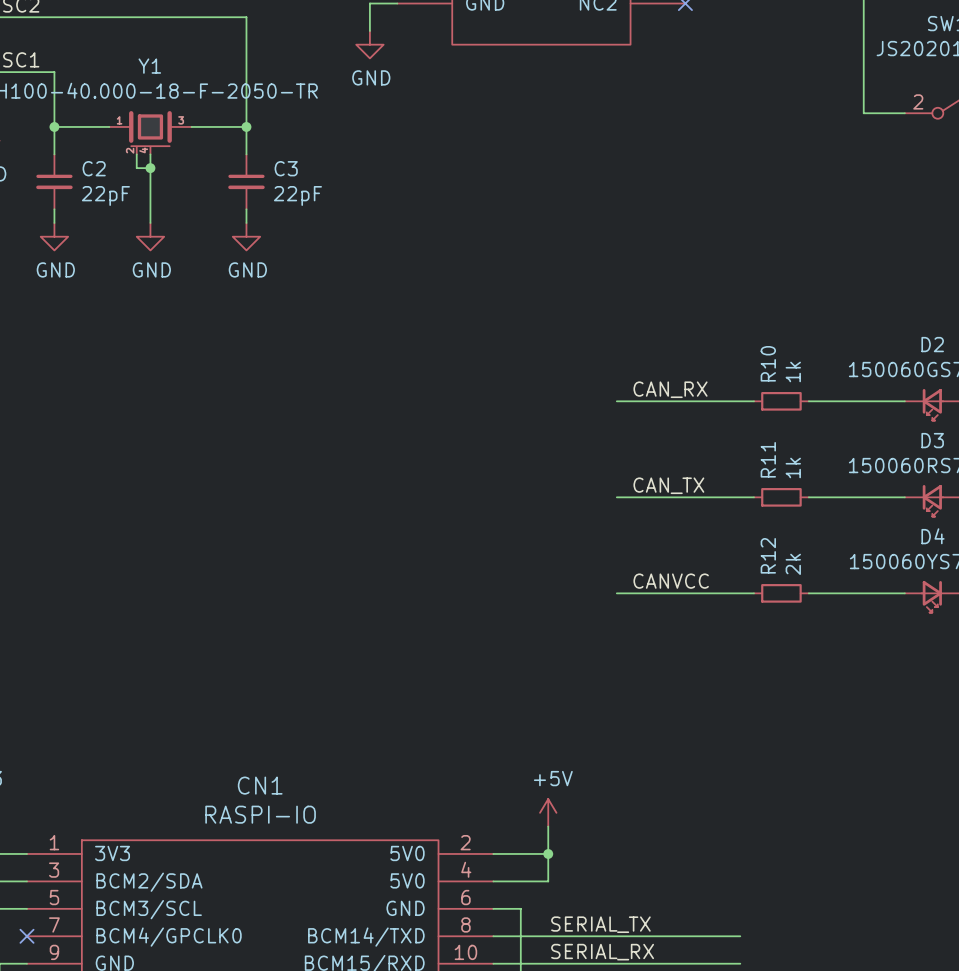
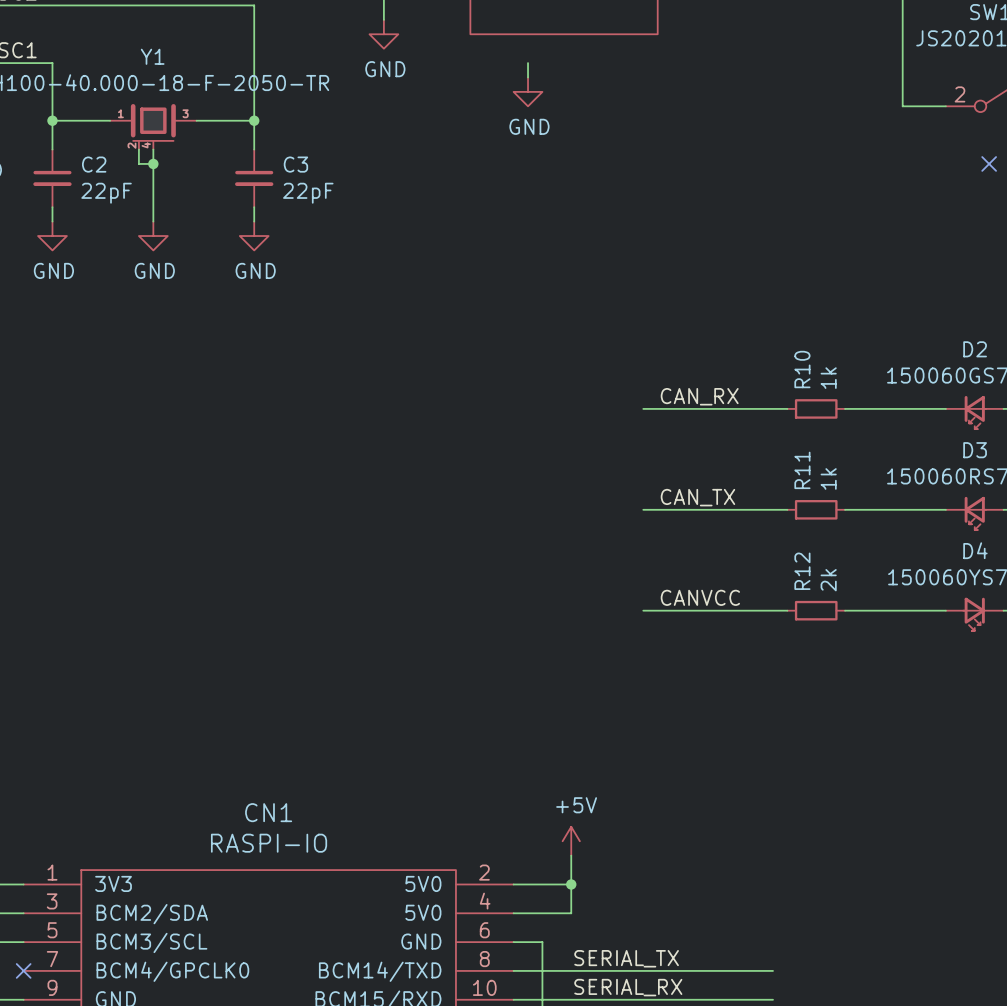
wire: none -> (528, 63) (528, 77)
power symbol: none -> GND (528, 91)
no-connect mark: none -> (989, 163)

